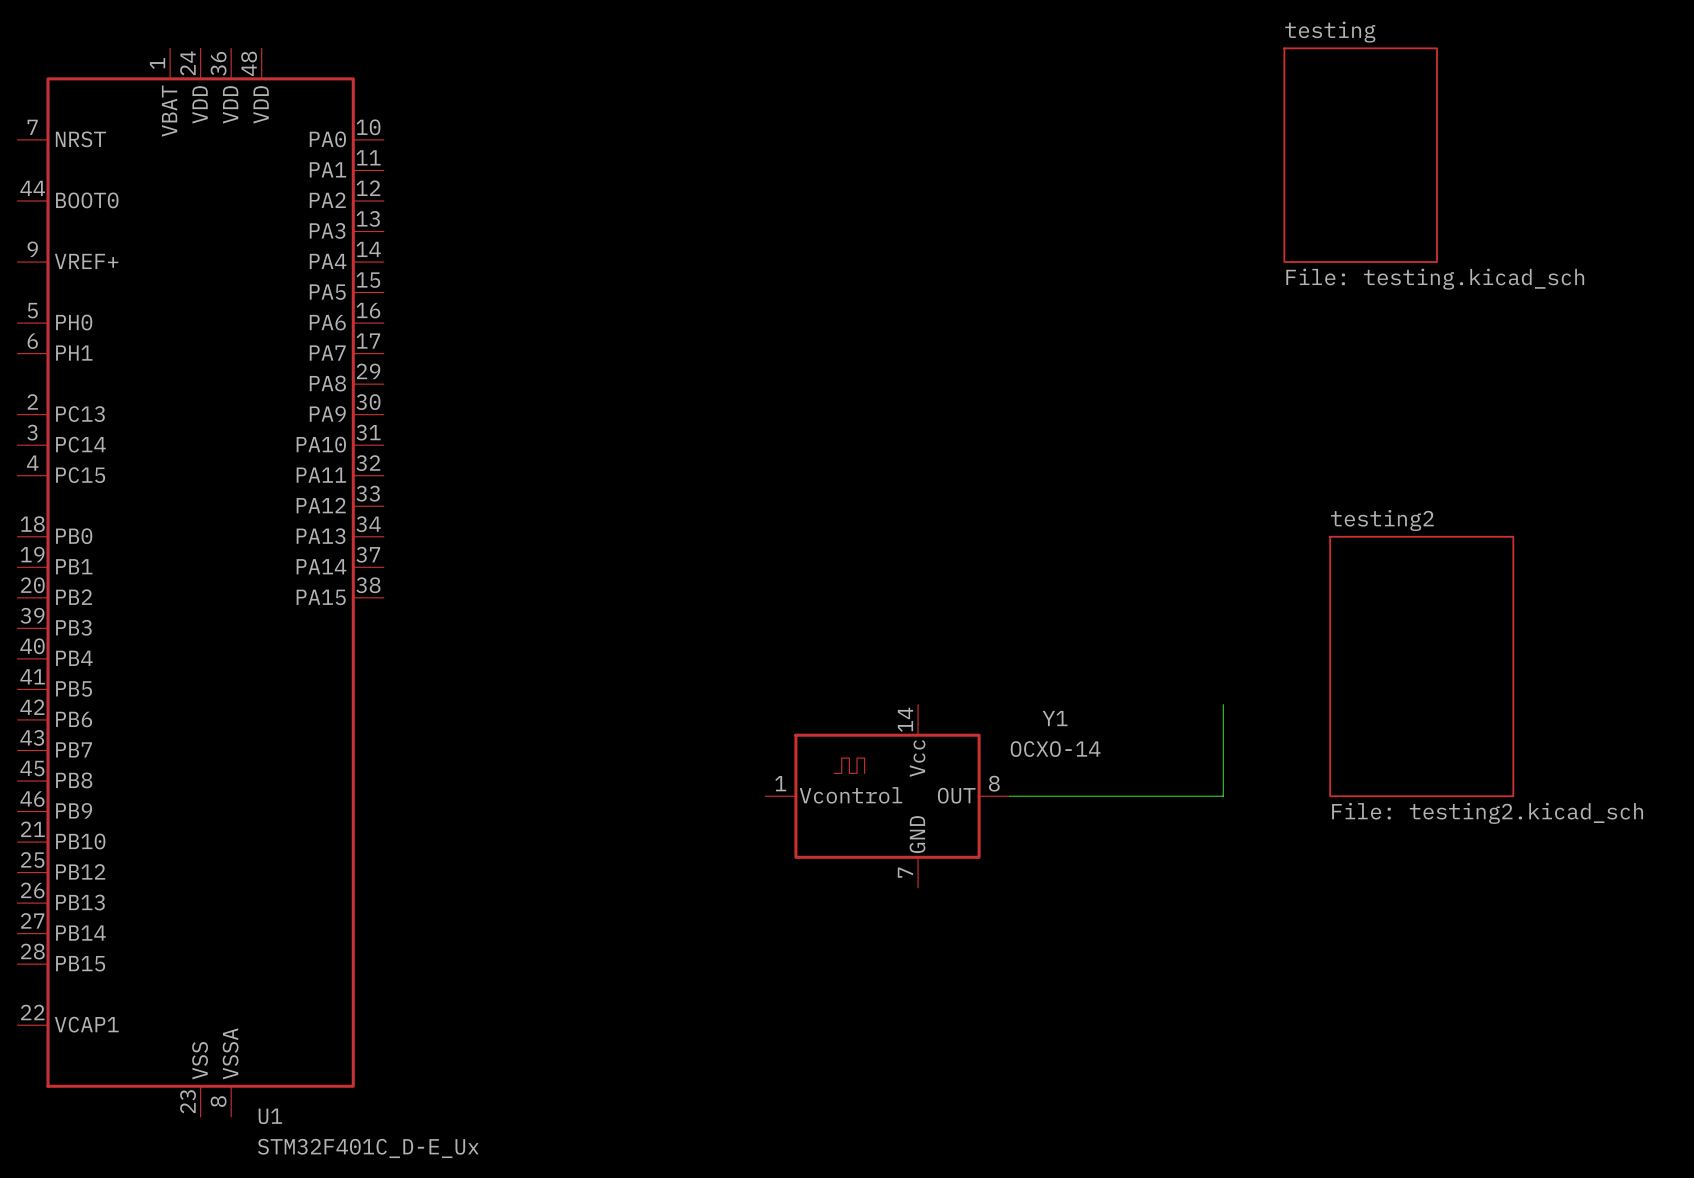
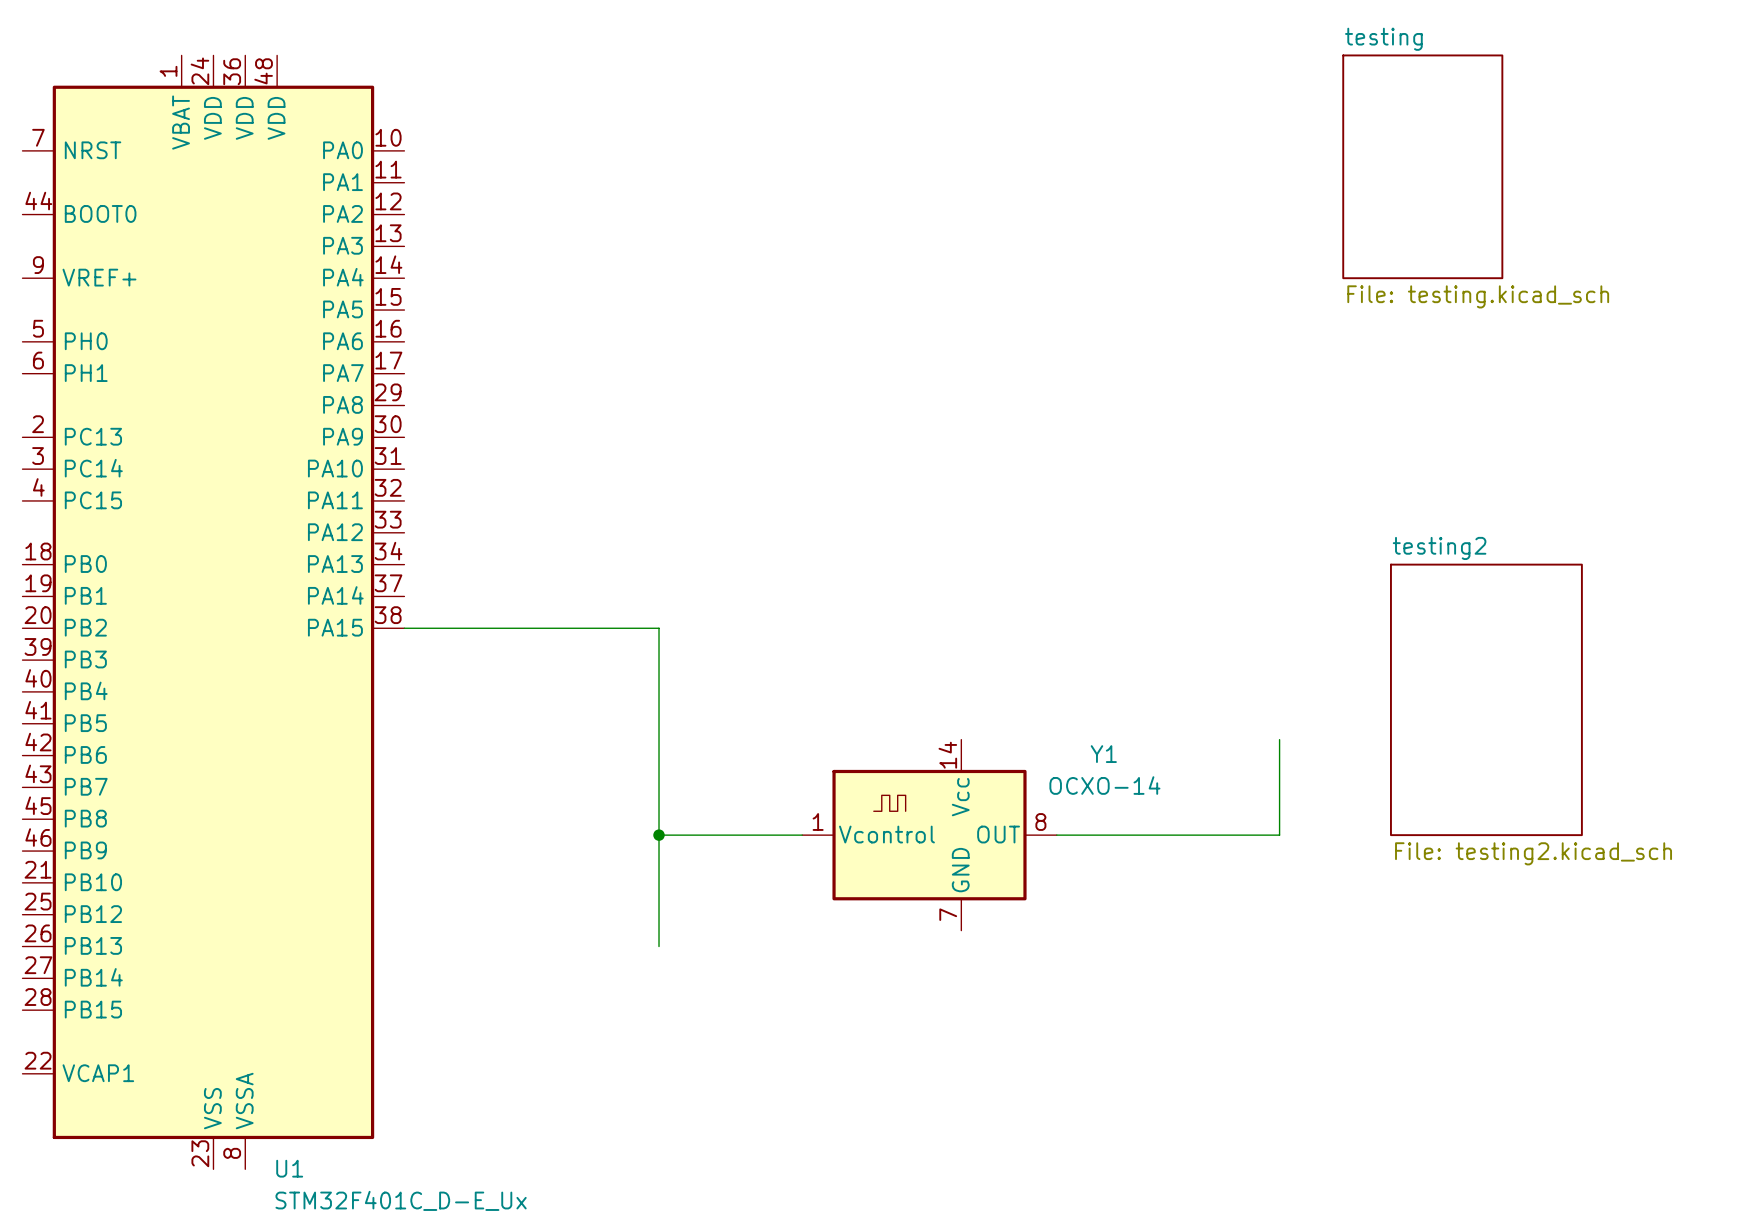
wire: none -> (404, 628) (659, 628) (659, 946)
wire: none -> (659, 835) (802, 835)
junction: none -> (659, 835)

